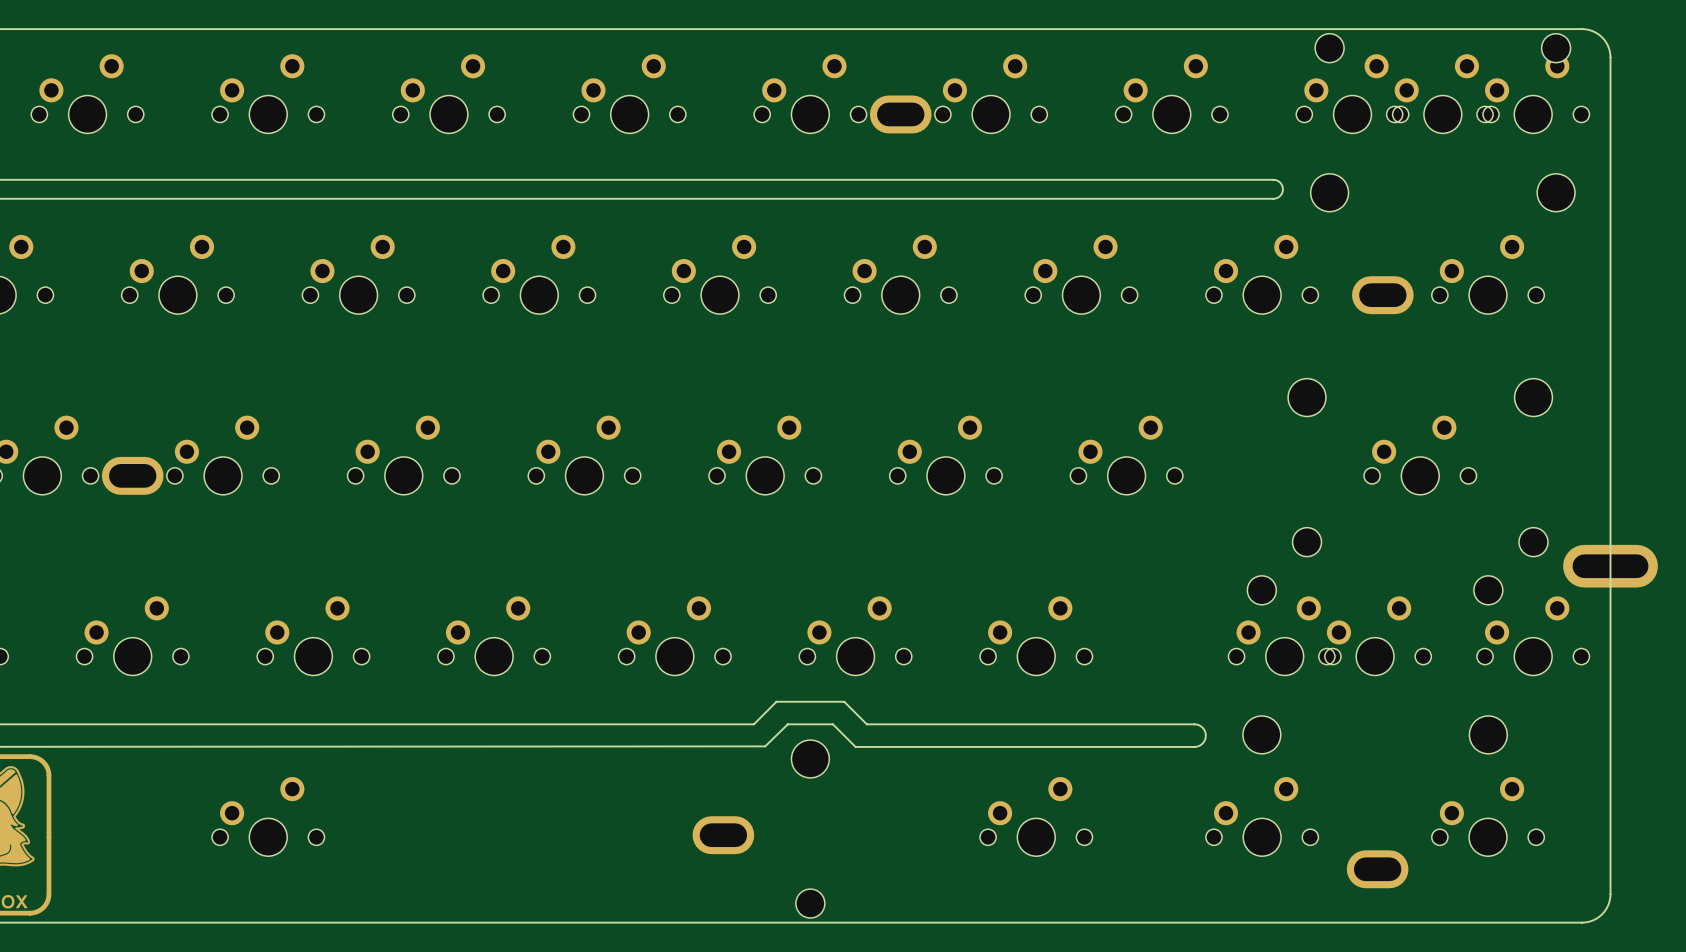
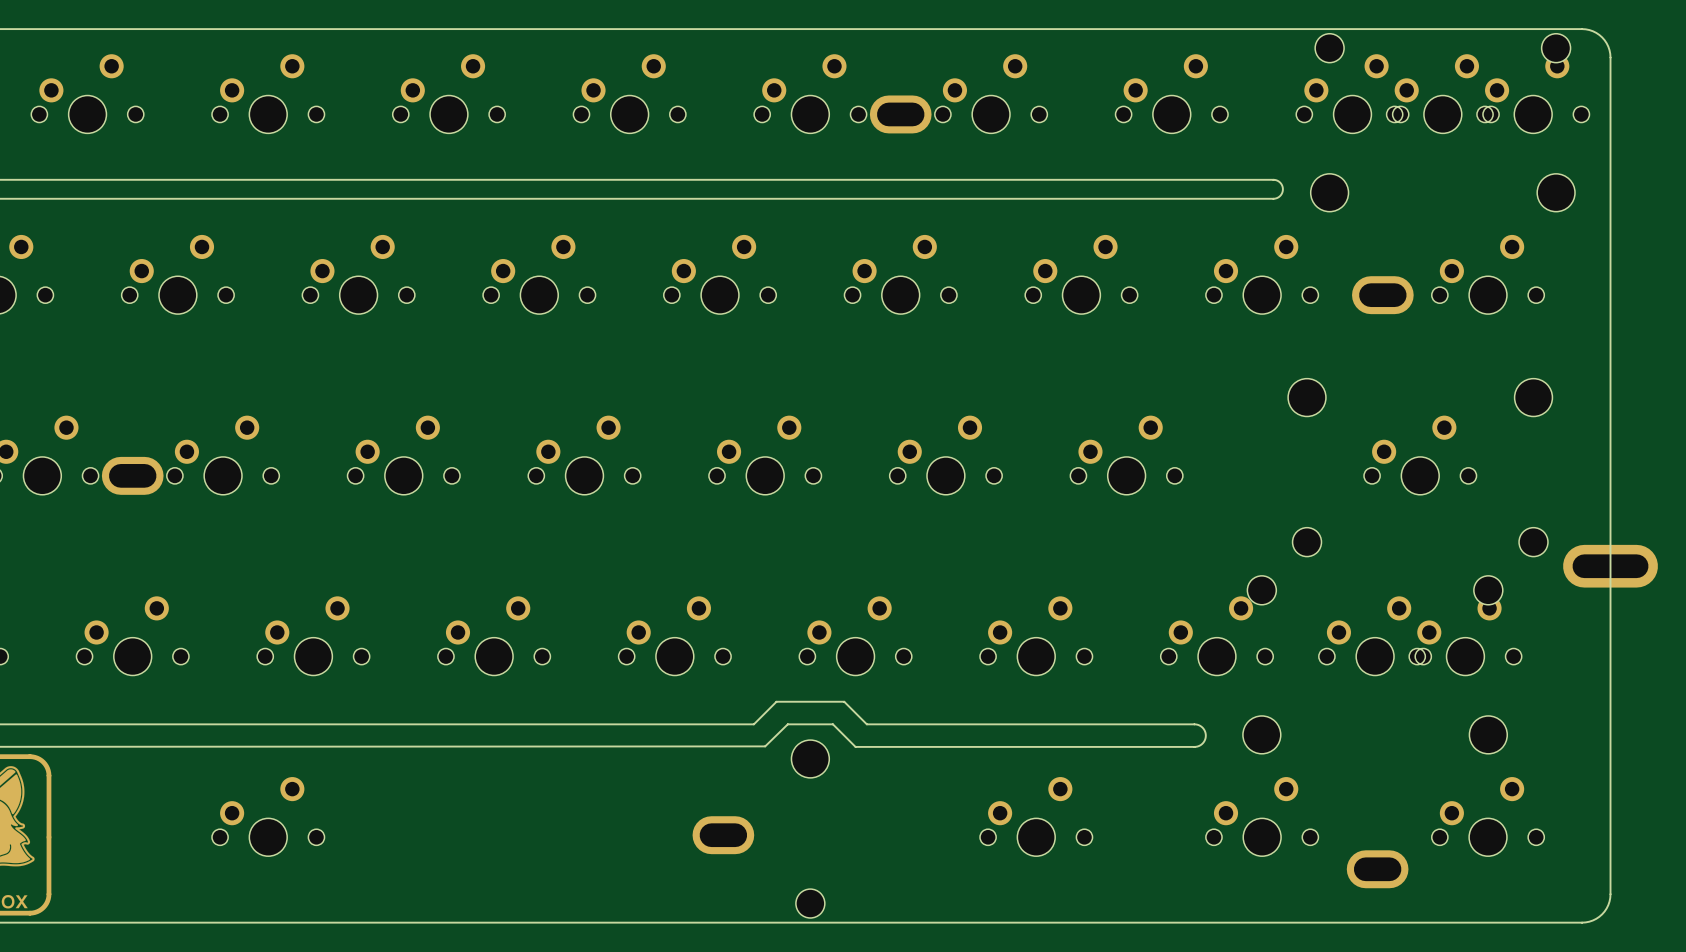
part position: (1284, 635) -> (1216, 635)
part position: (1533, 635) -> (1465, 635)

